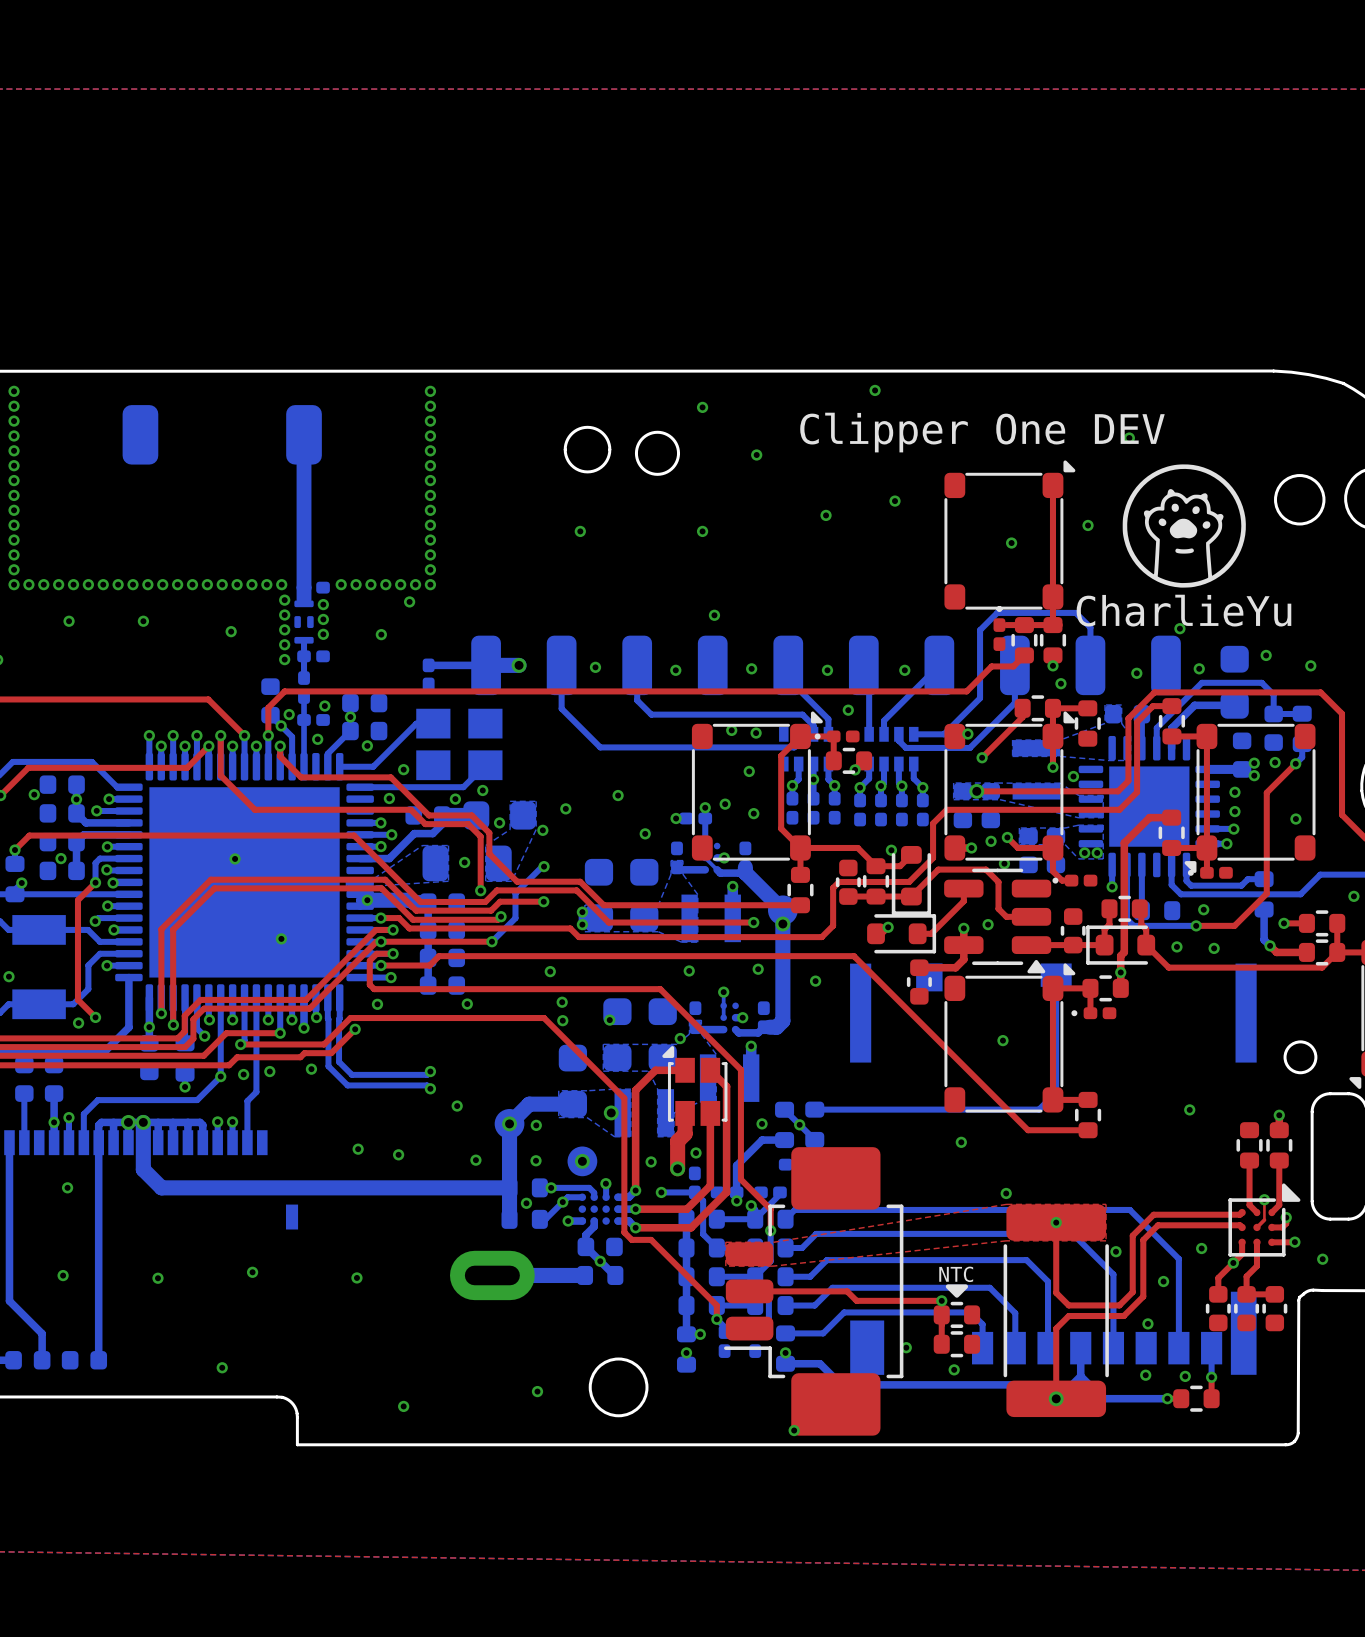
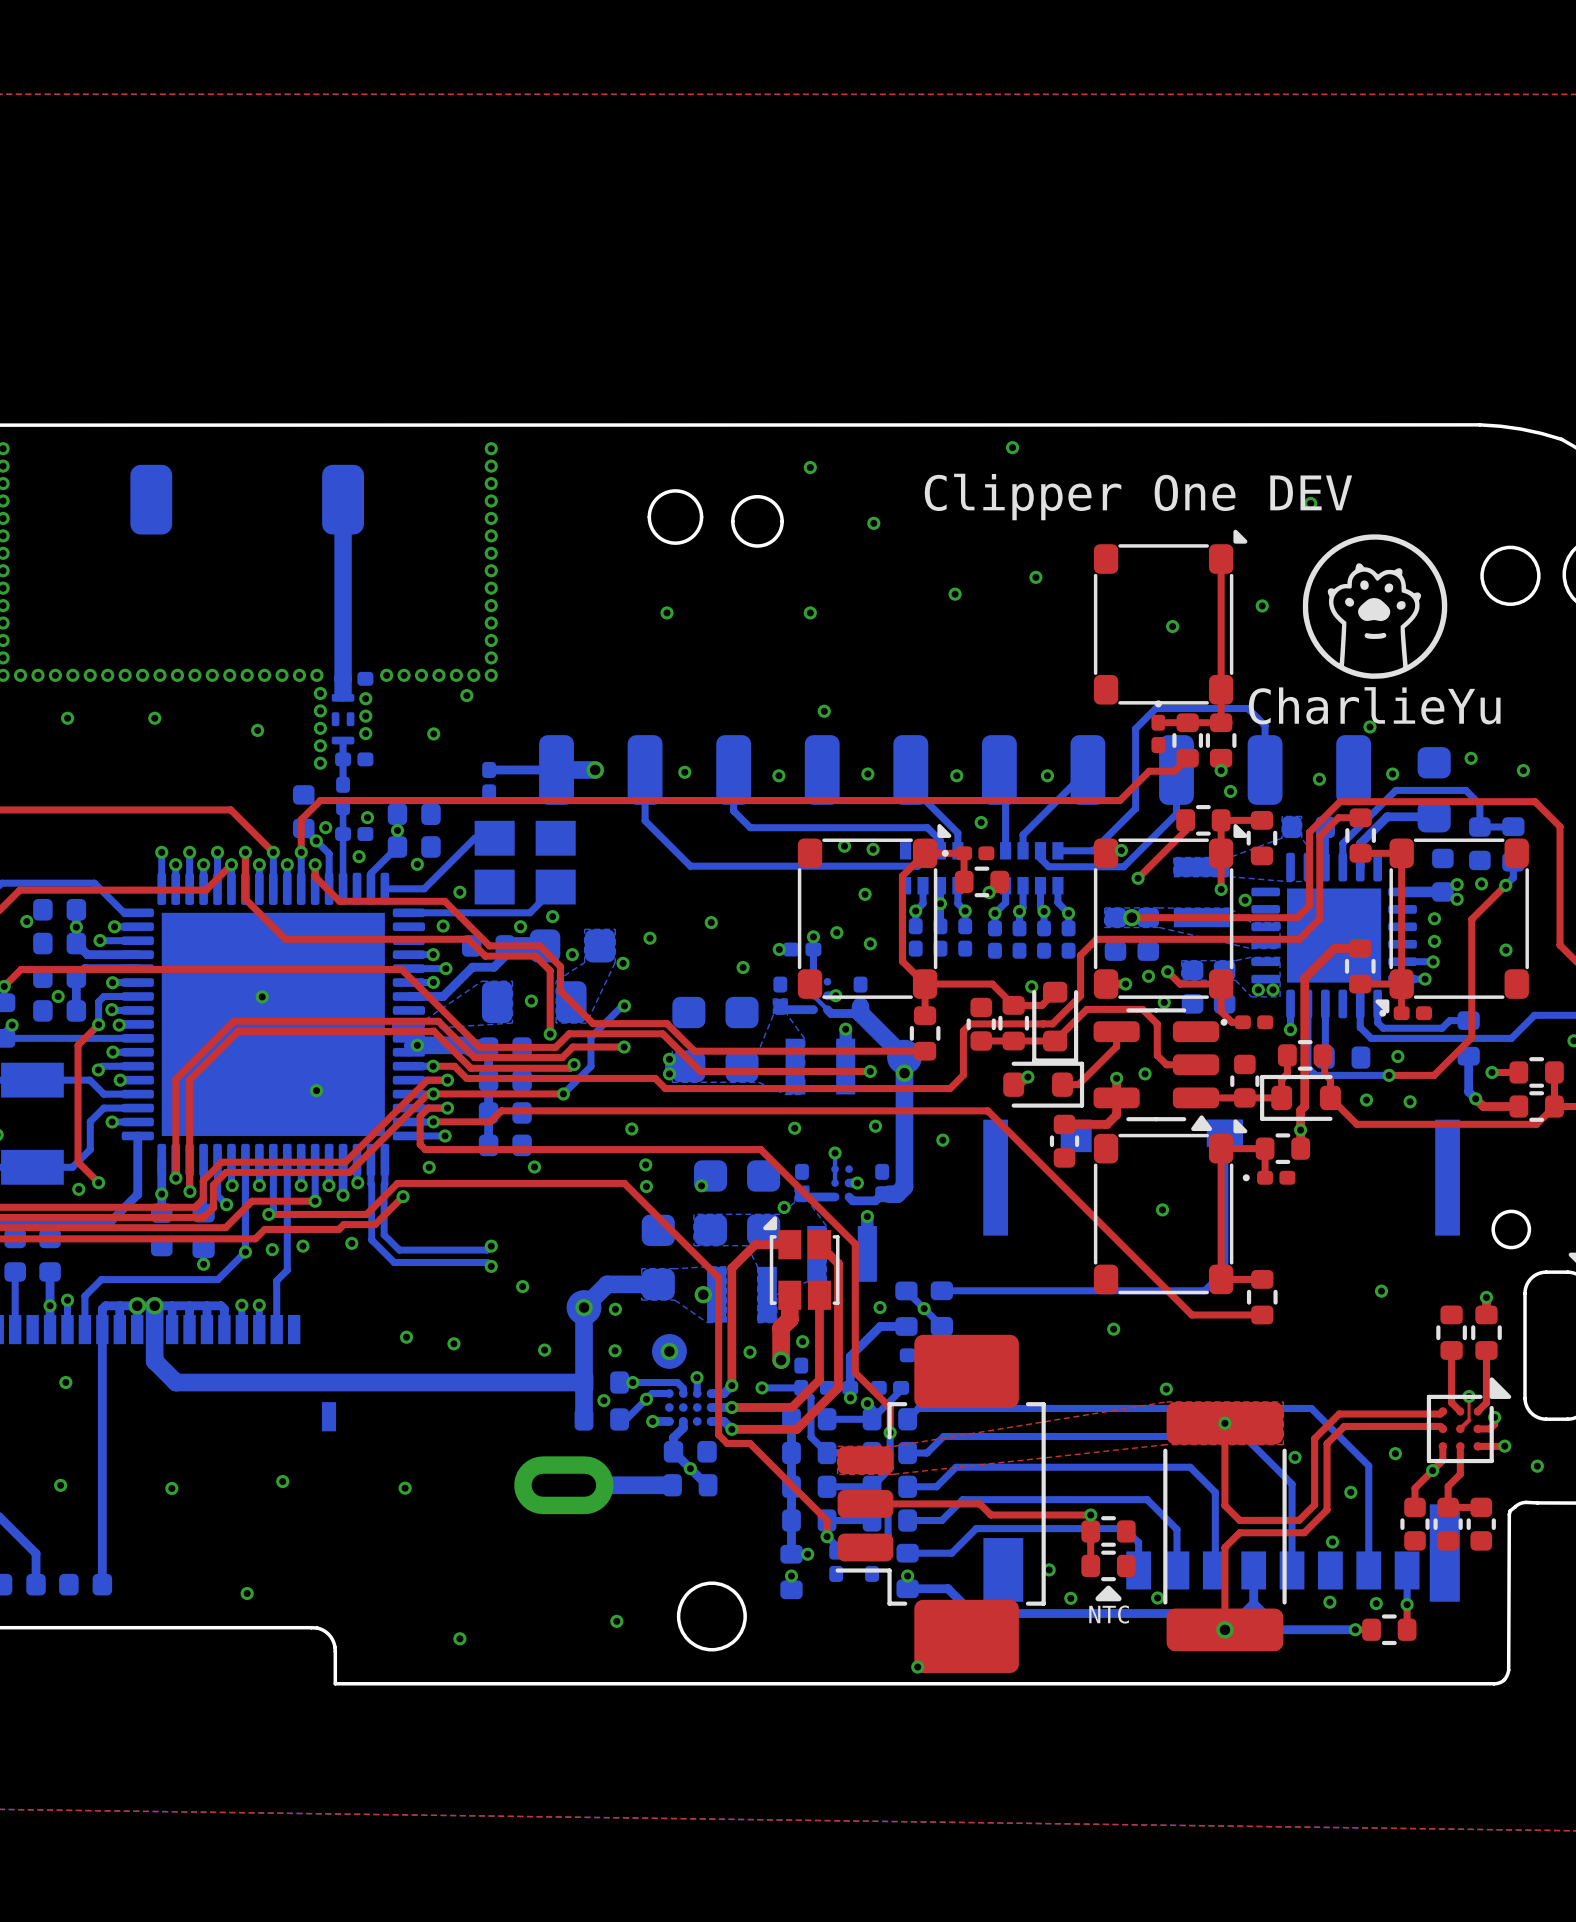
text position: NTC (956, 1274) -> NTC (1109, 1614)
drawing: [945, 1284, 969, 1298] -> none
drawing: none -> [1095, 1585, 1122, 1602]
via: (954, 1369) -> none
via: none -> (1070, 1598)
via: none -> (1157, 1598)

